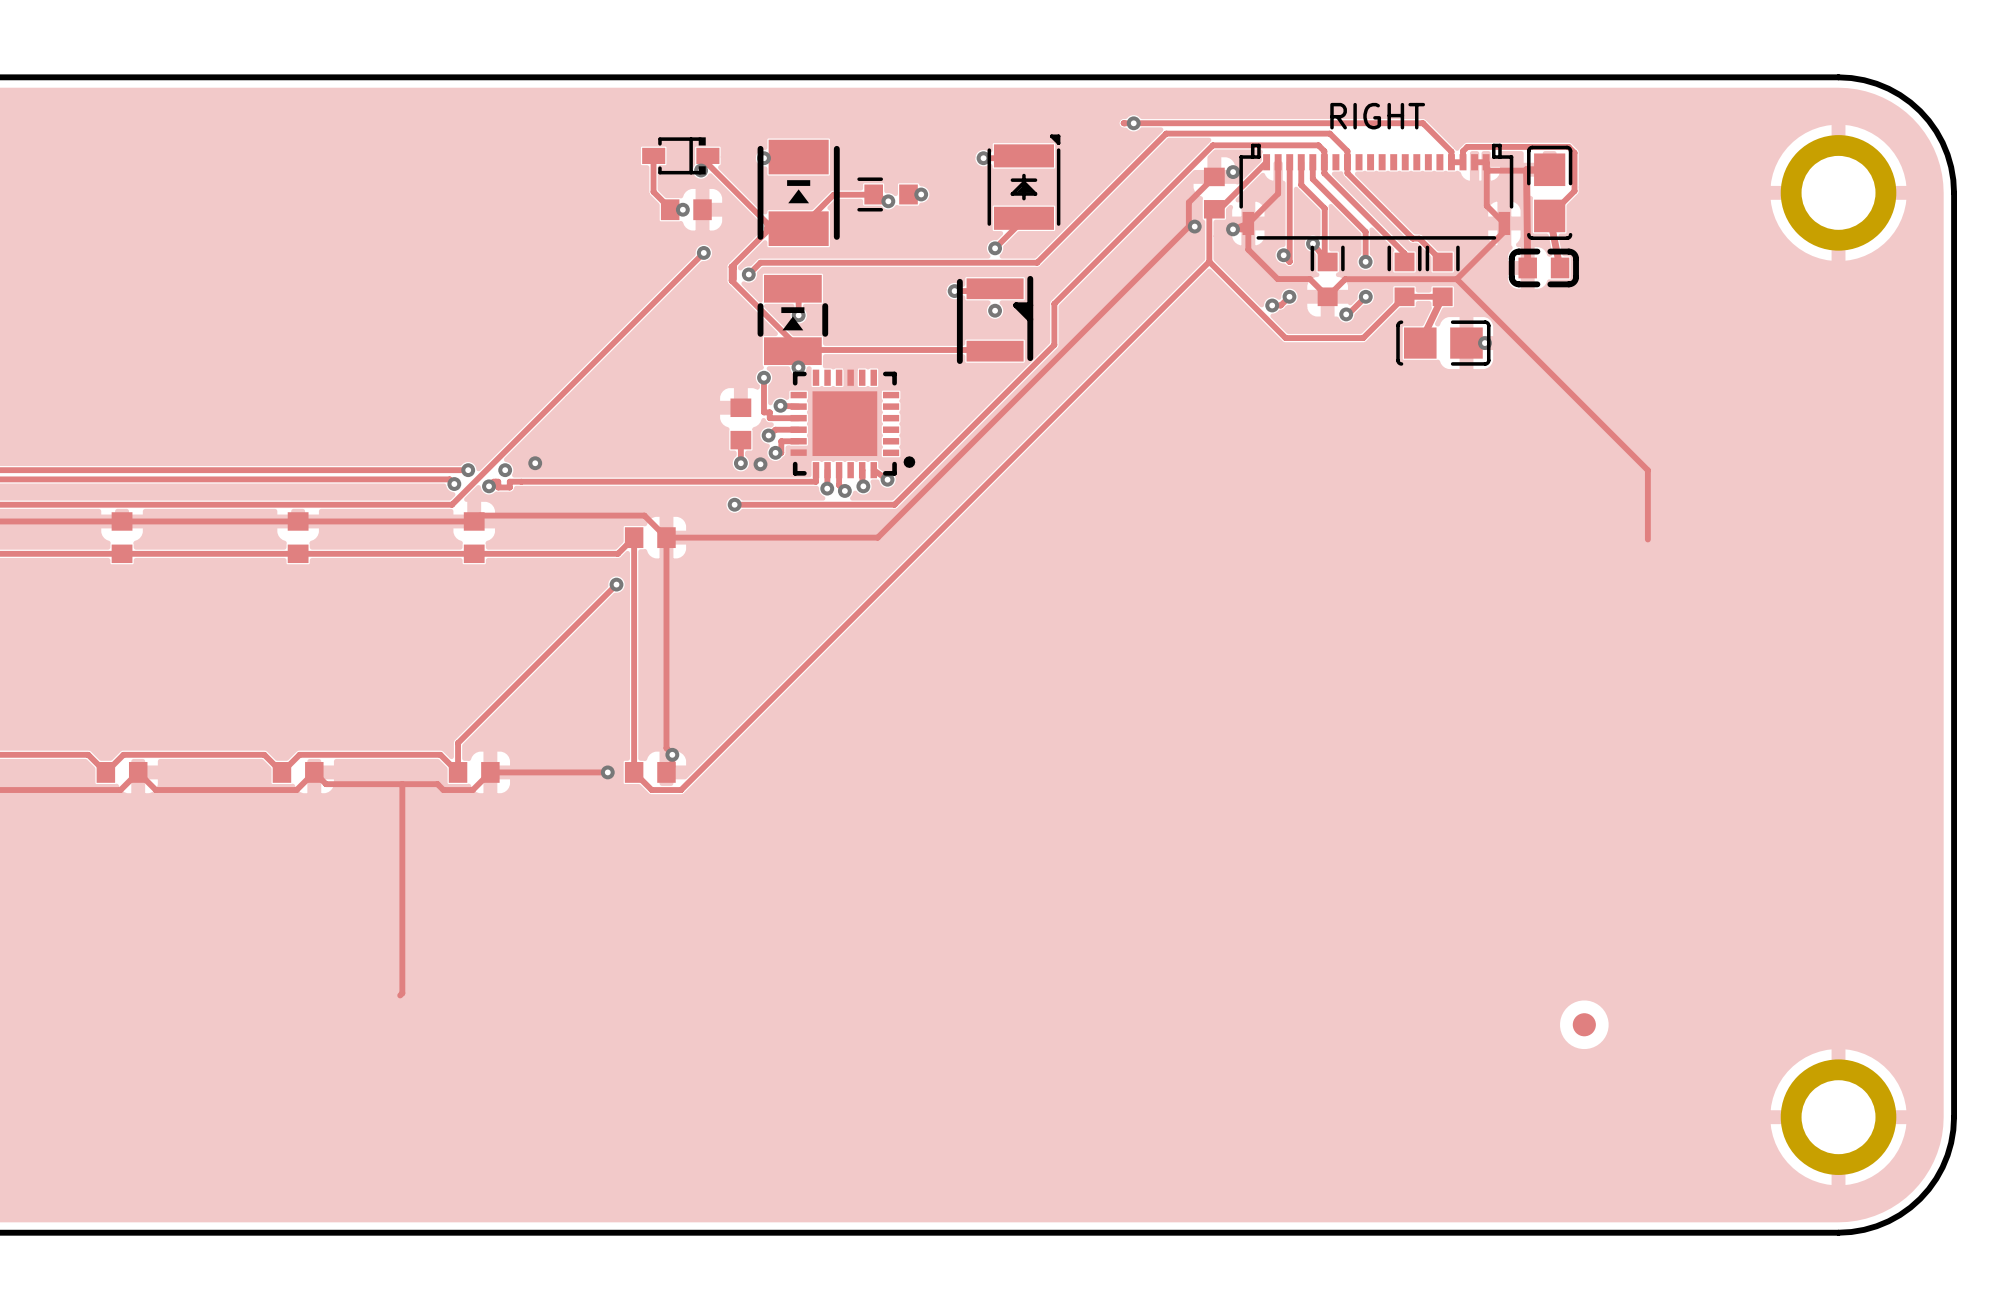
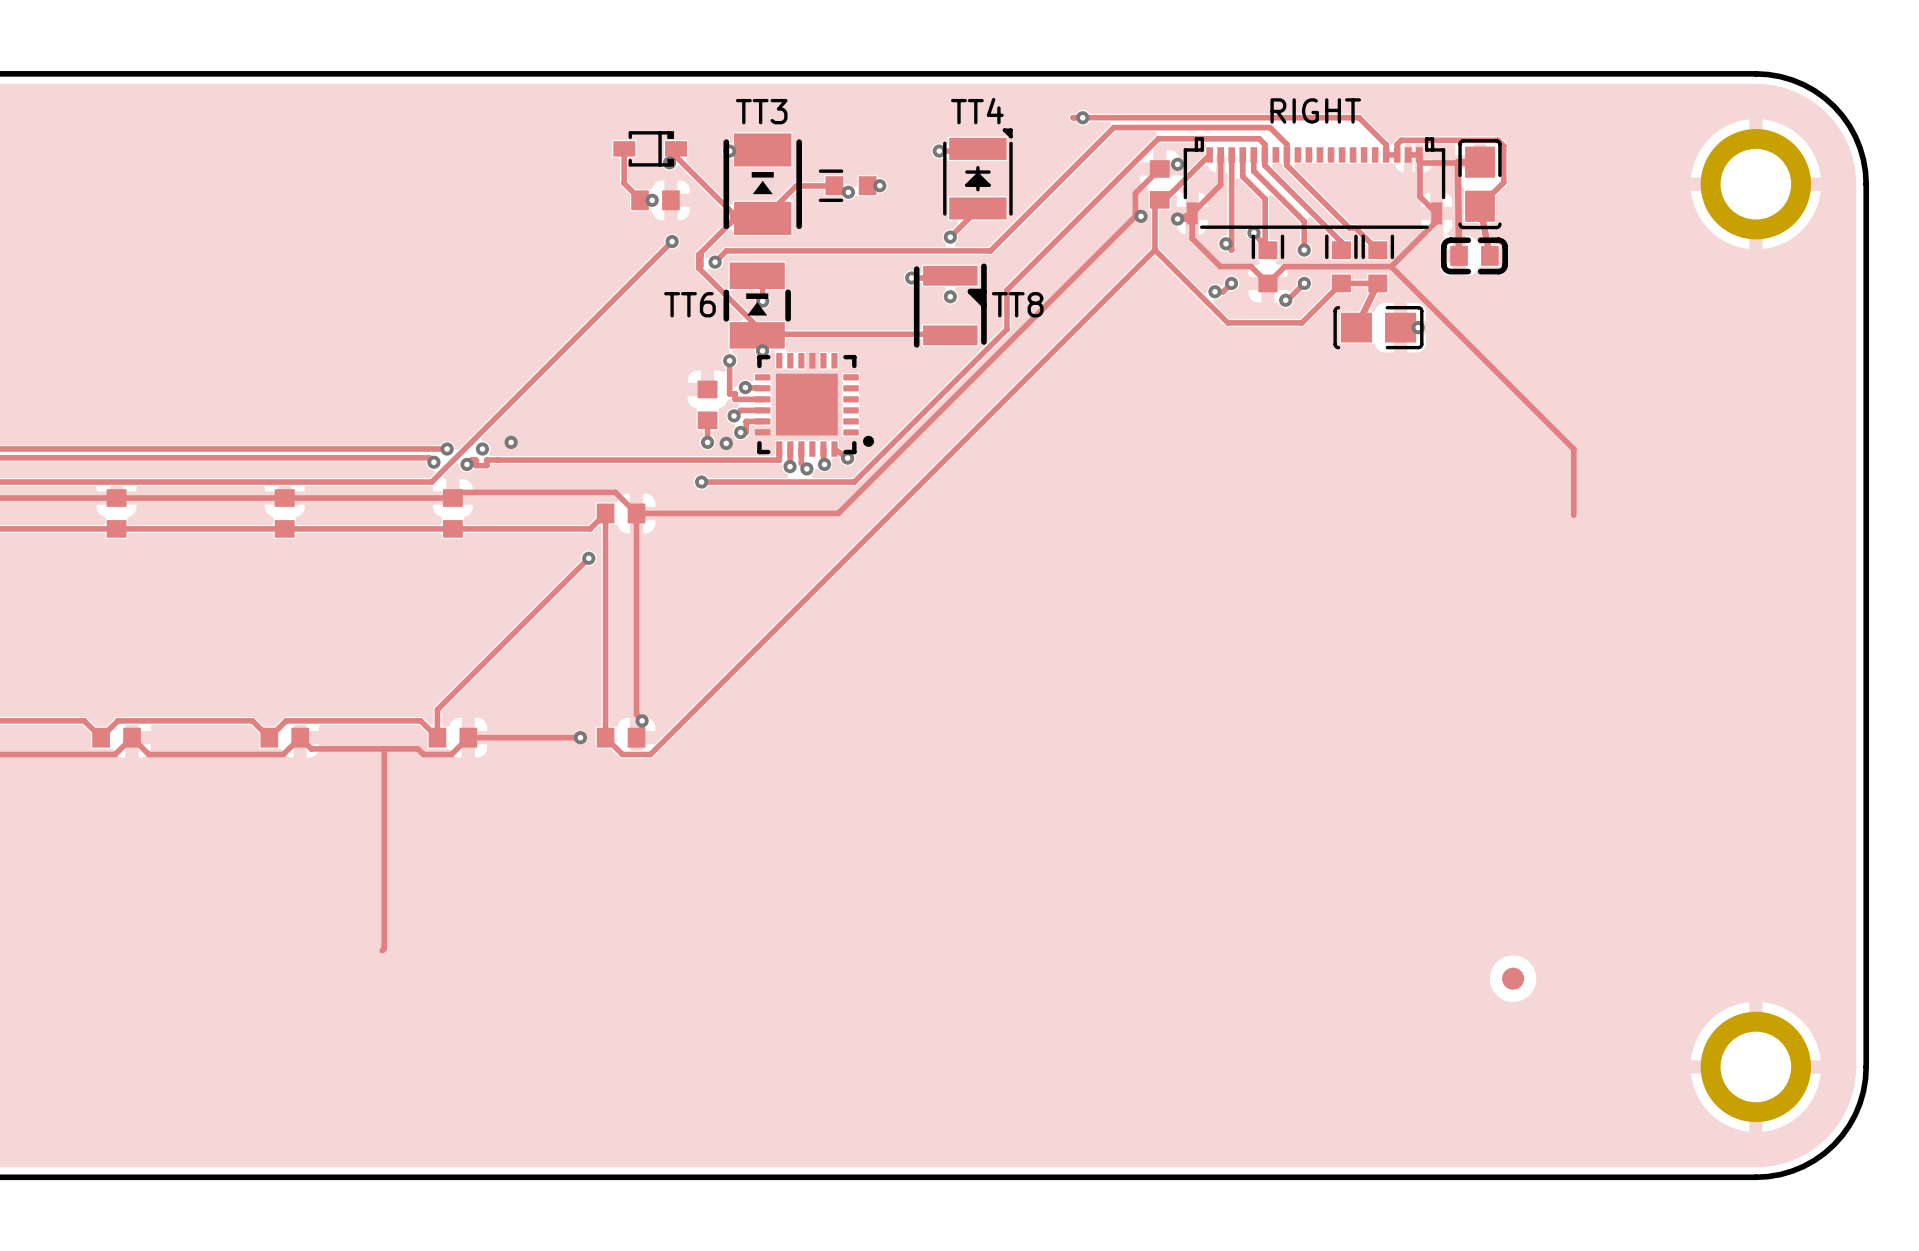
text: none -> TT3 (761, 111)
text: none -> TT4 (977, 111)
text: none -> TT6 (689, 304)
text: none -> TT8 (1017, 304)

